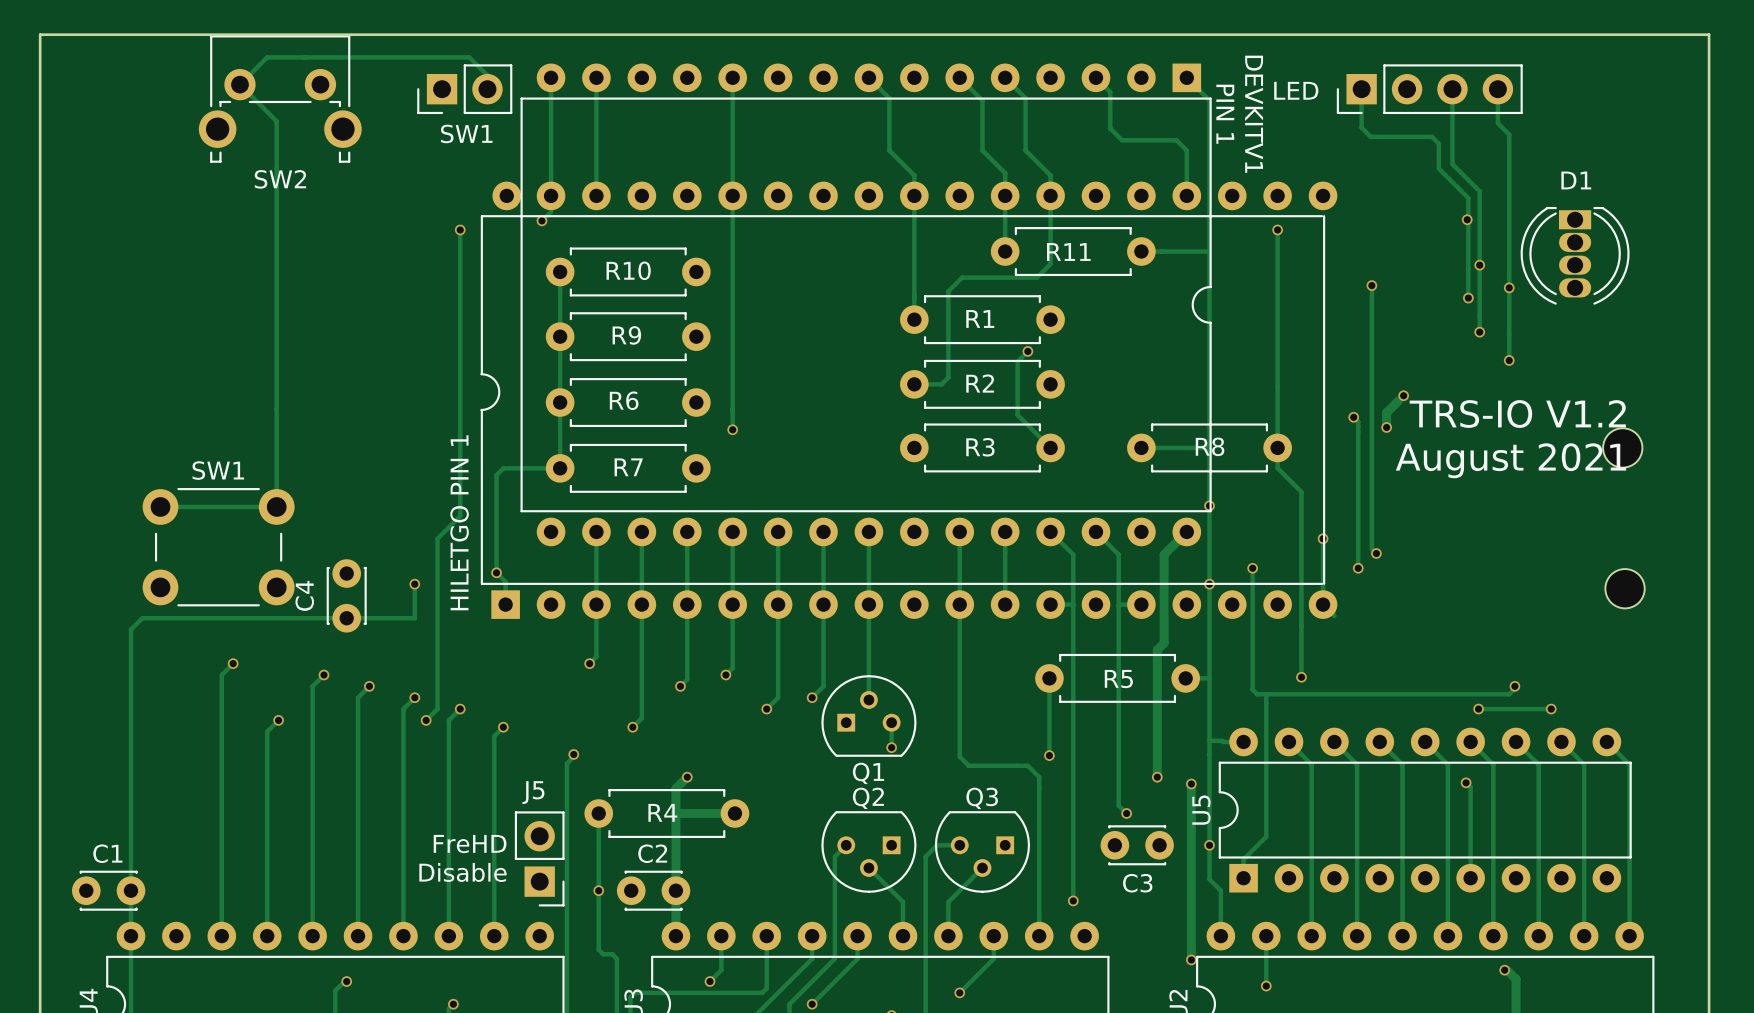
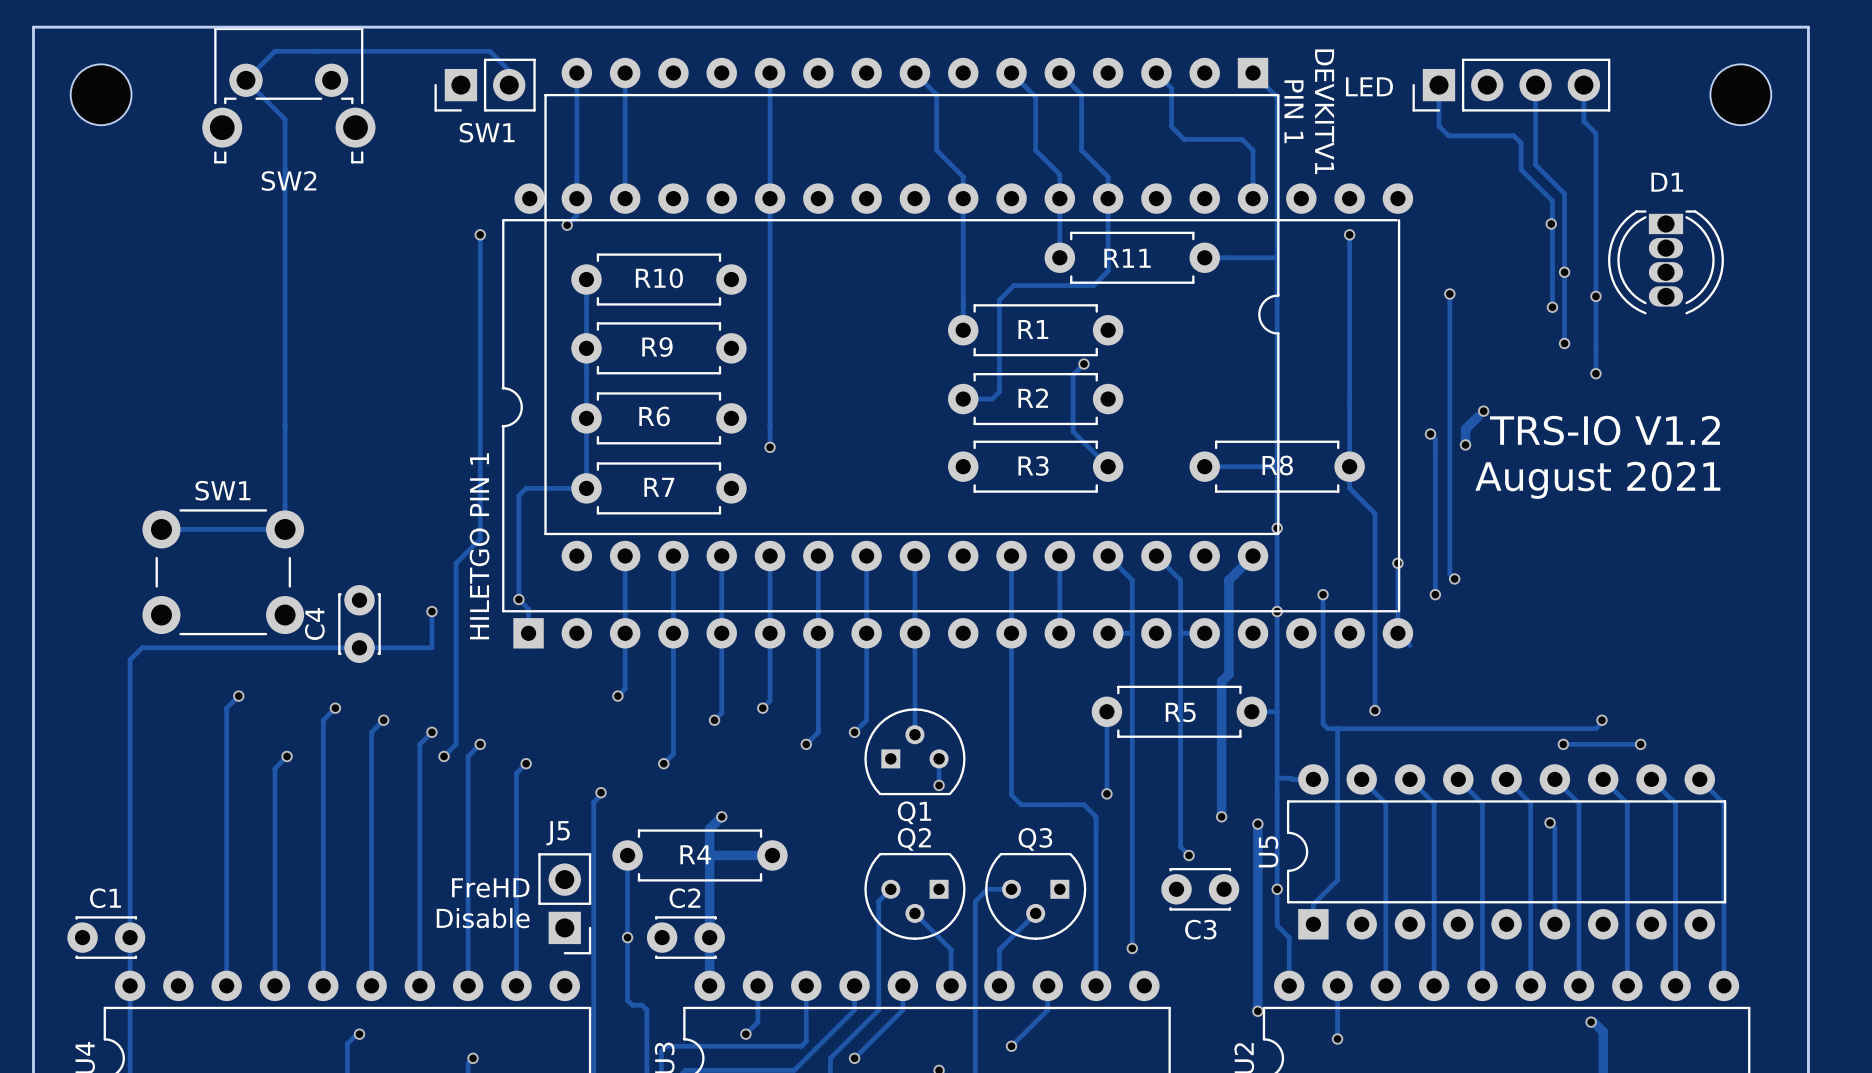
part: none -> (101, 94)
part: none -> (1740, 94)
part: (1622, 447) -> none
part: (1625, 588) -> none

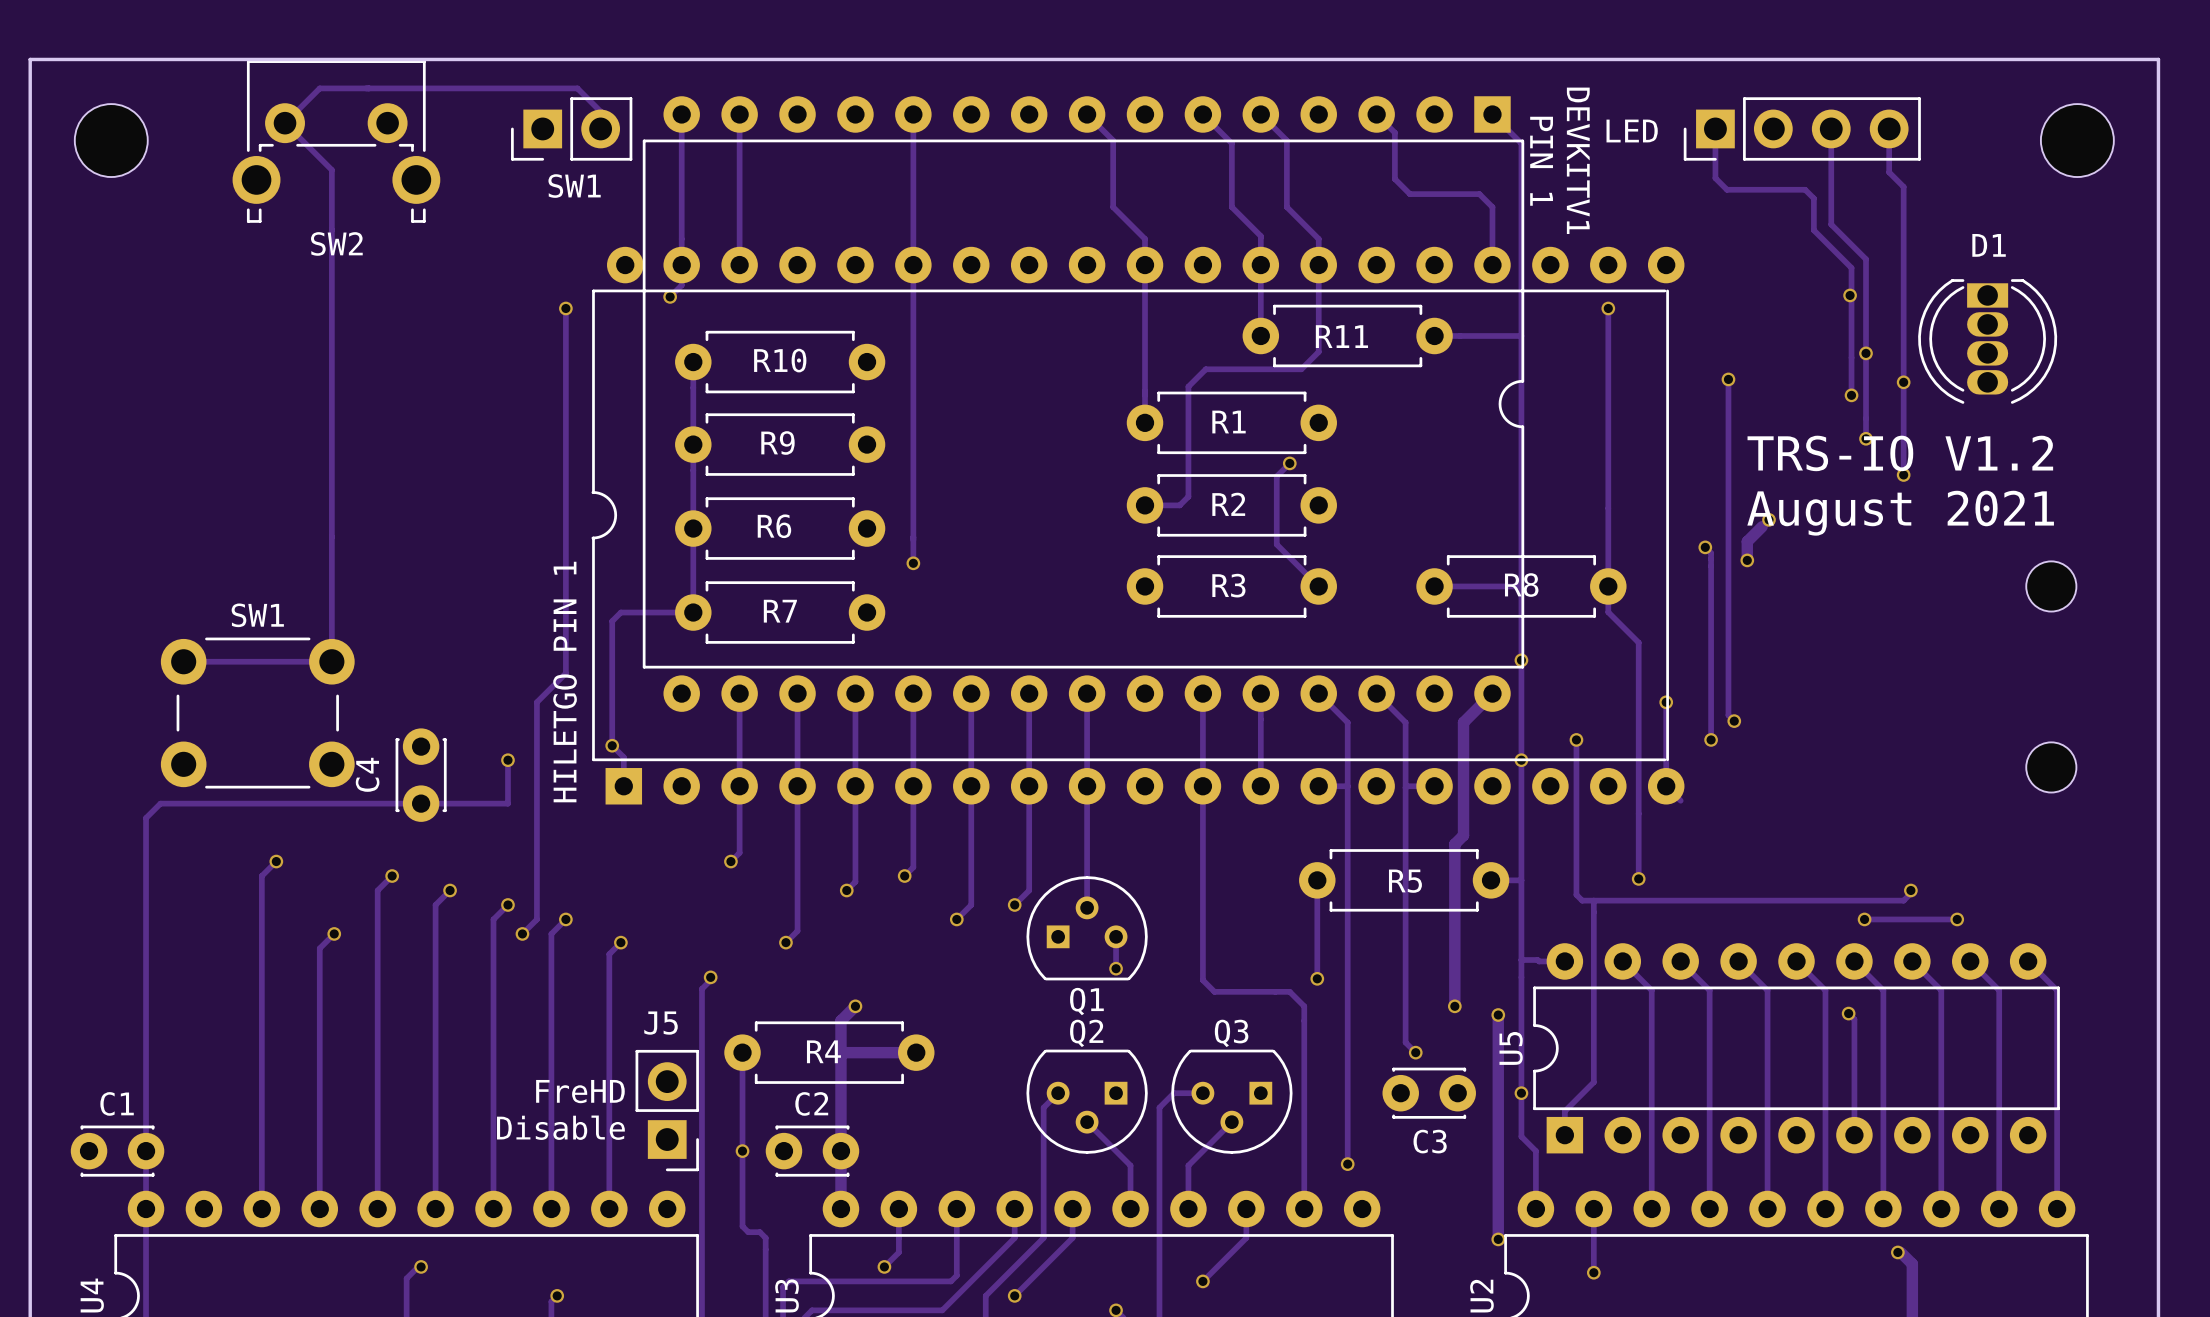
text position: TRS-IO V1.2 (1605, 430) -> TRS-IO V1.2 (1900, 453)
part: none -> (2051, 586)
text position: August 2021 (1597, 480) -> August 2021 (1900, 513)
part: none -> (2051, 767)

